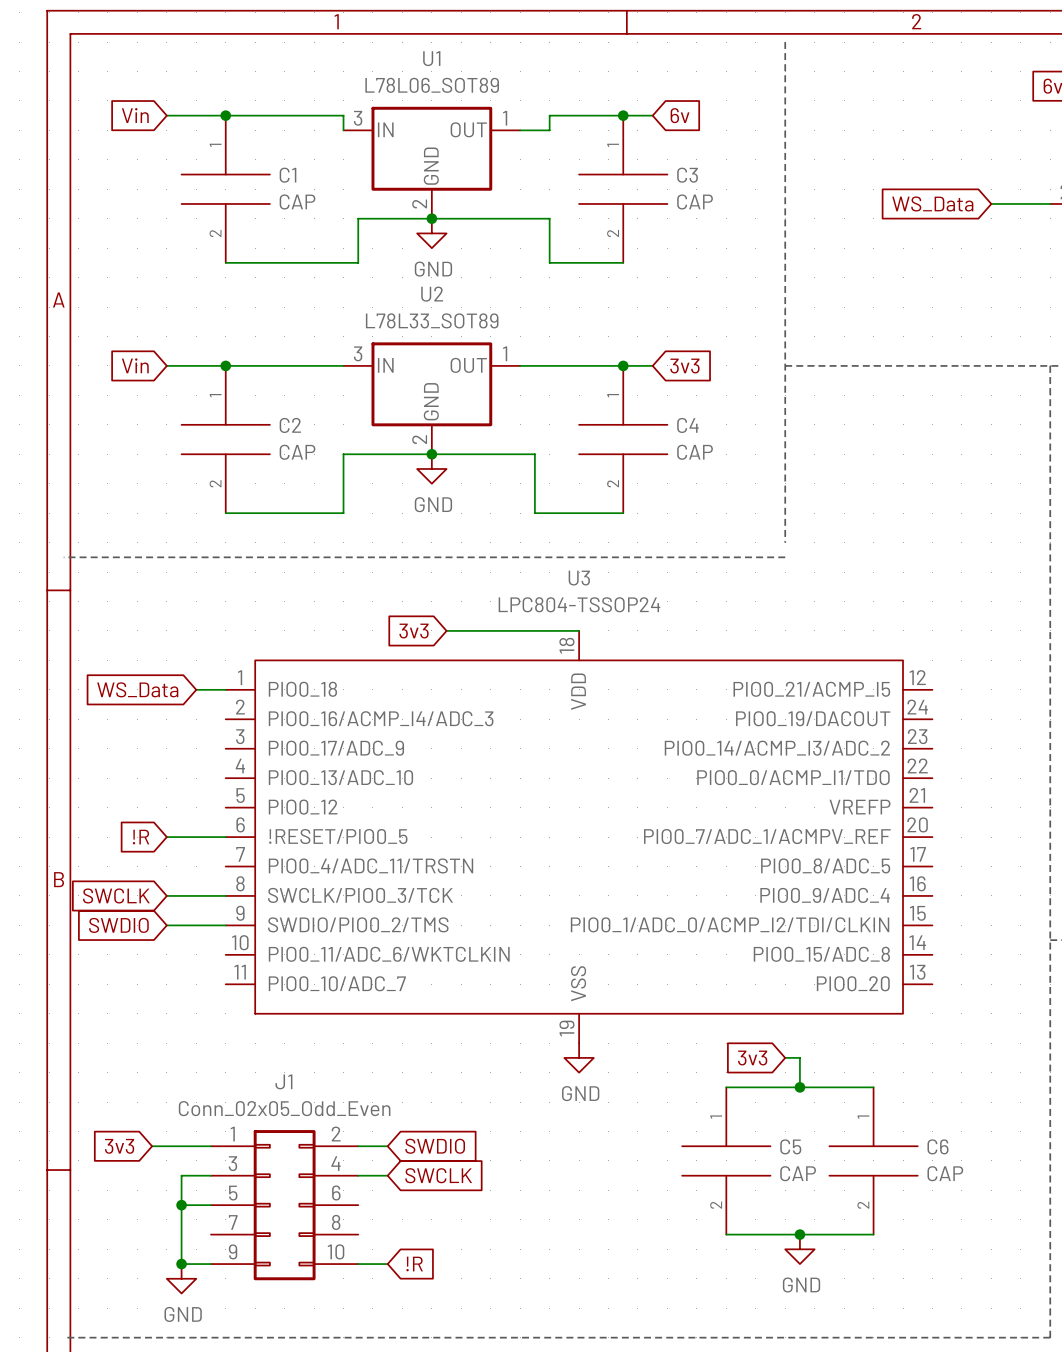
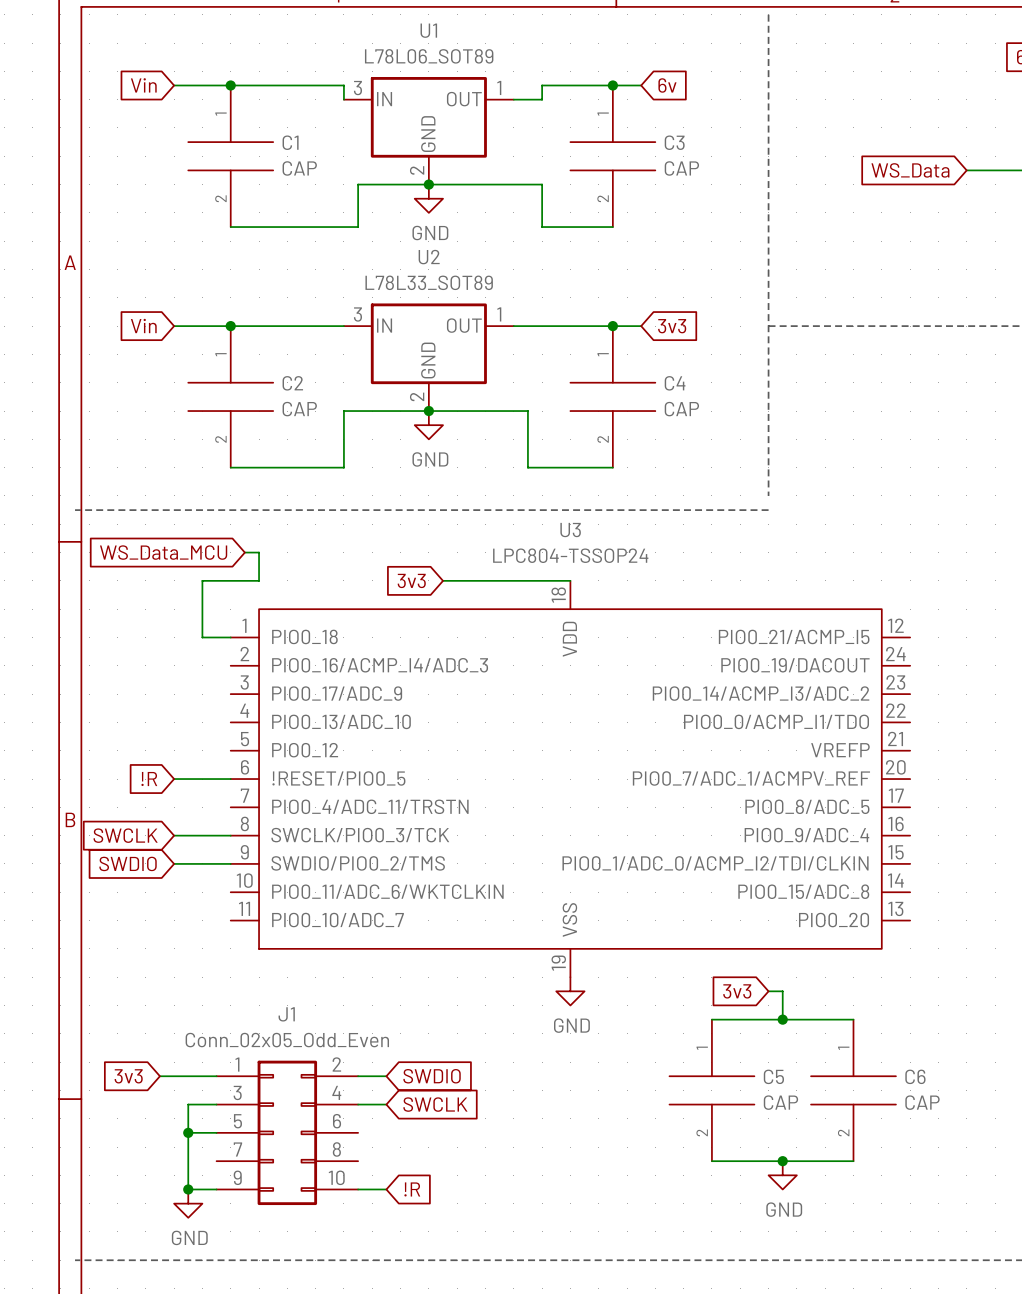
global label: none -> WS_Data_MCU (163, 552)
wire: none -> (244, 552) (259, 552) (259, 580) (202, 580) (202, 637)
global label: WS_Data (137, 689) -> none

